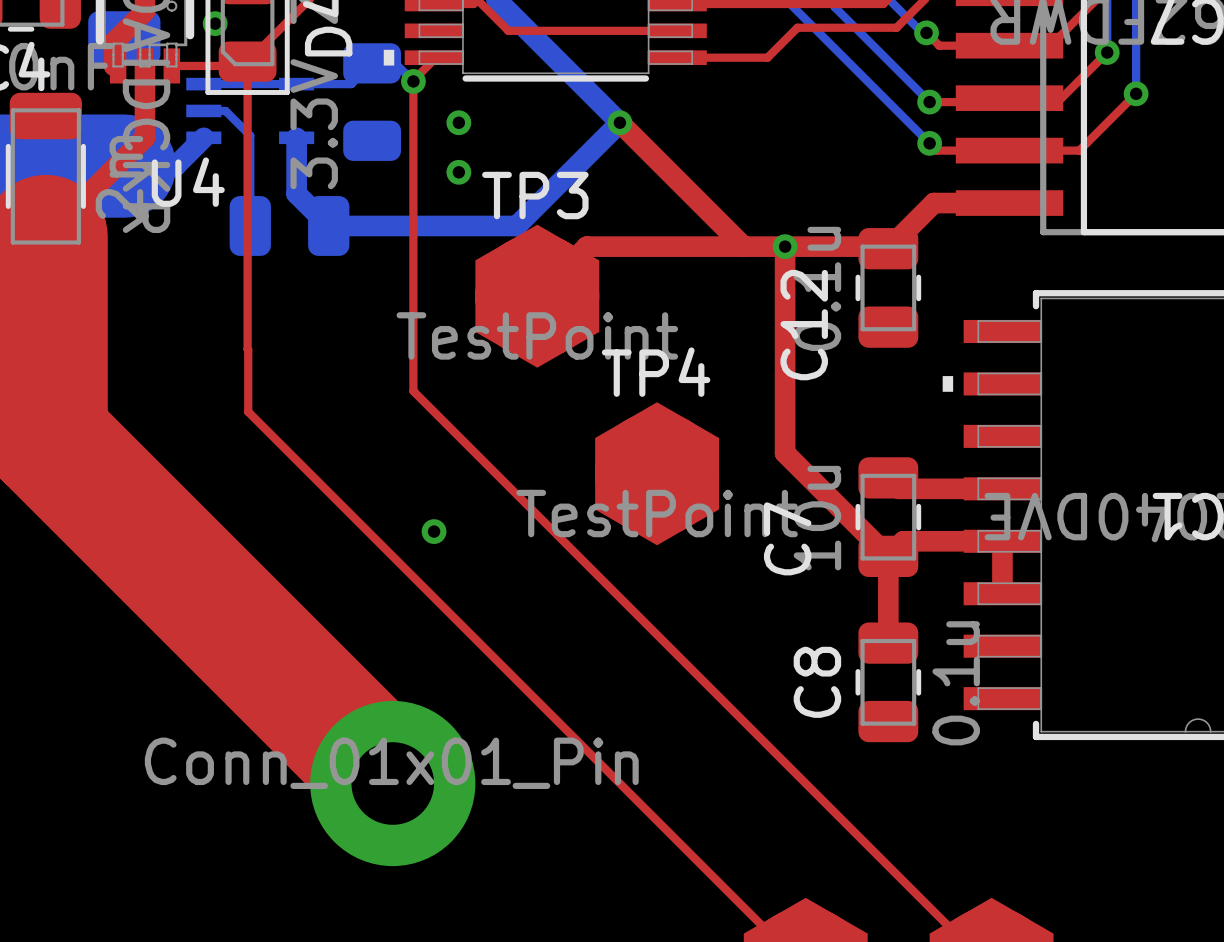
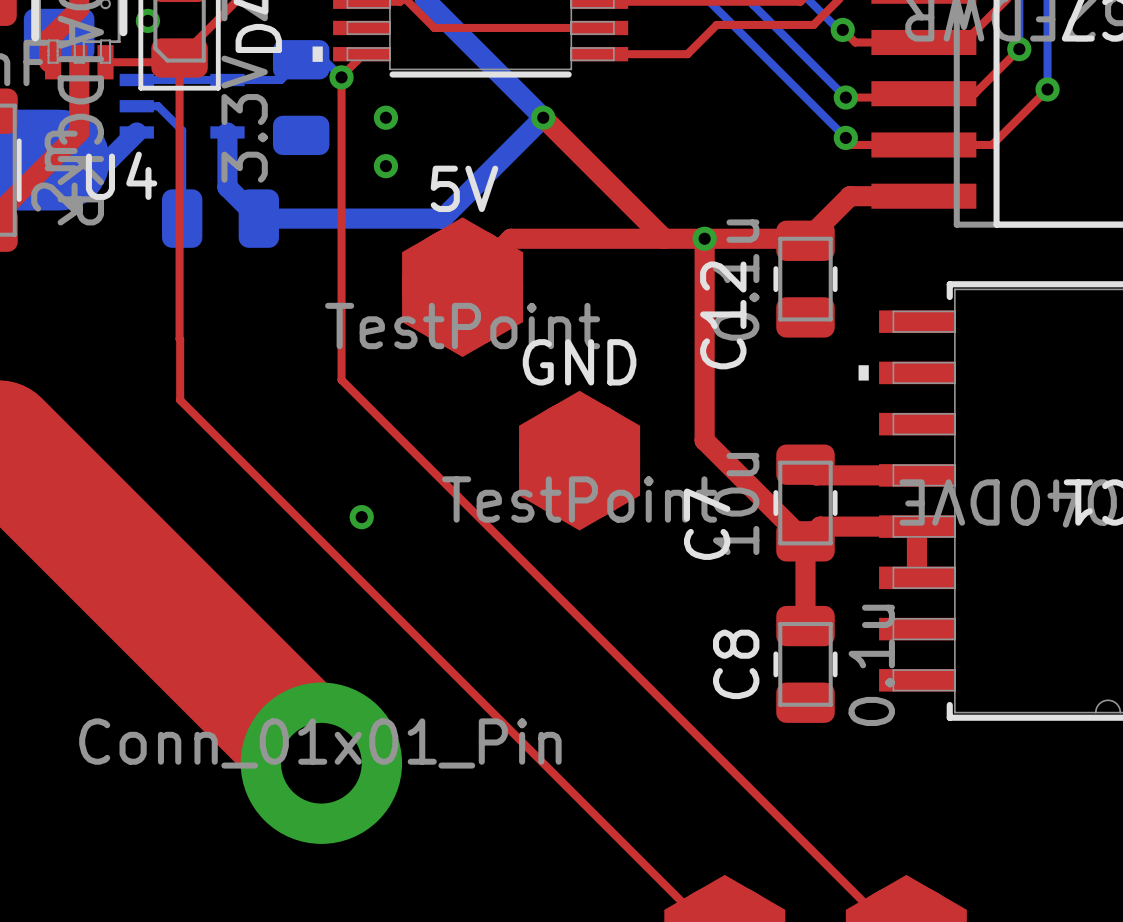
TP3 name: TP3 (535, 195) -> 5V (464, 188)
TP4 name: TP4 (656, 372) -> GND (579, 362)

